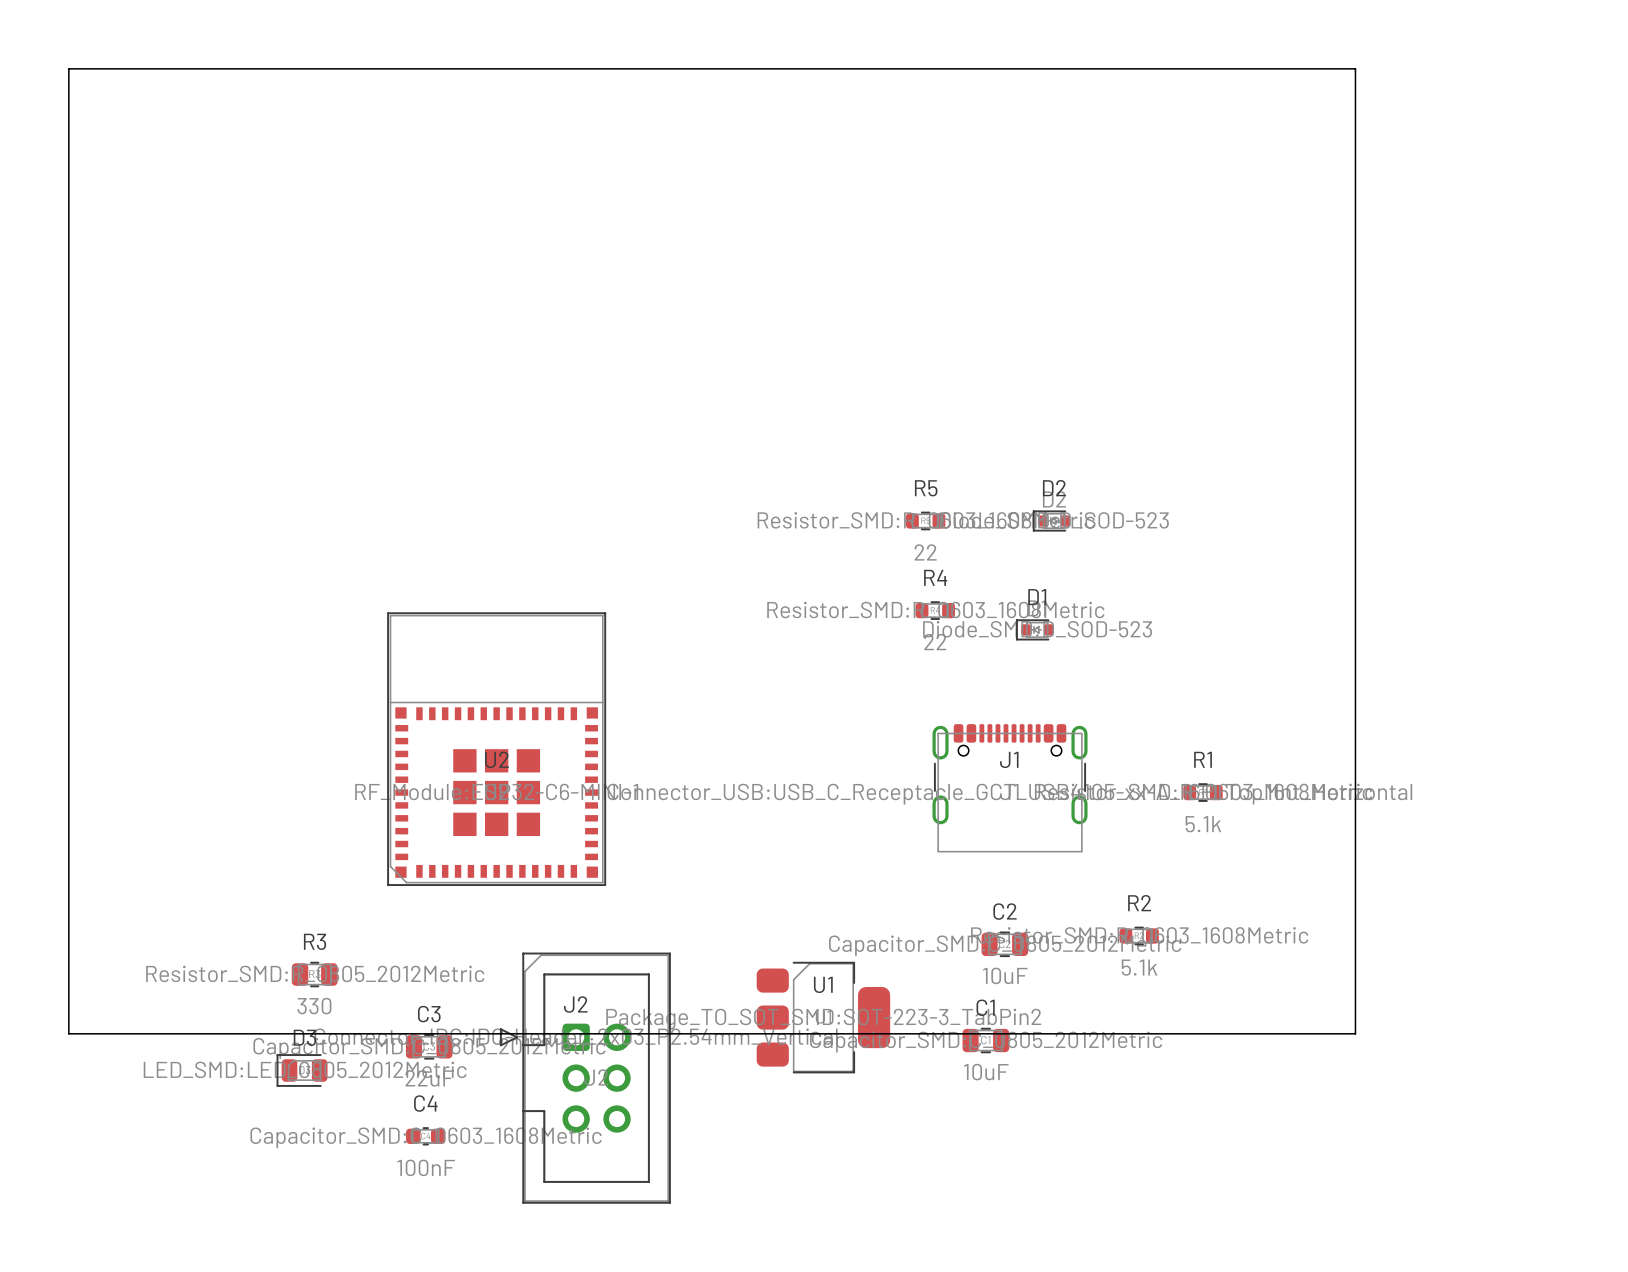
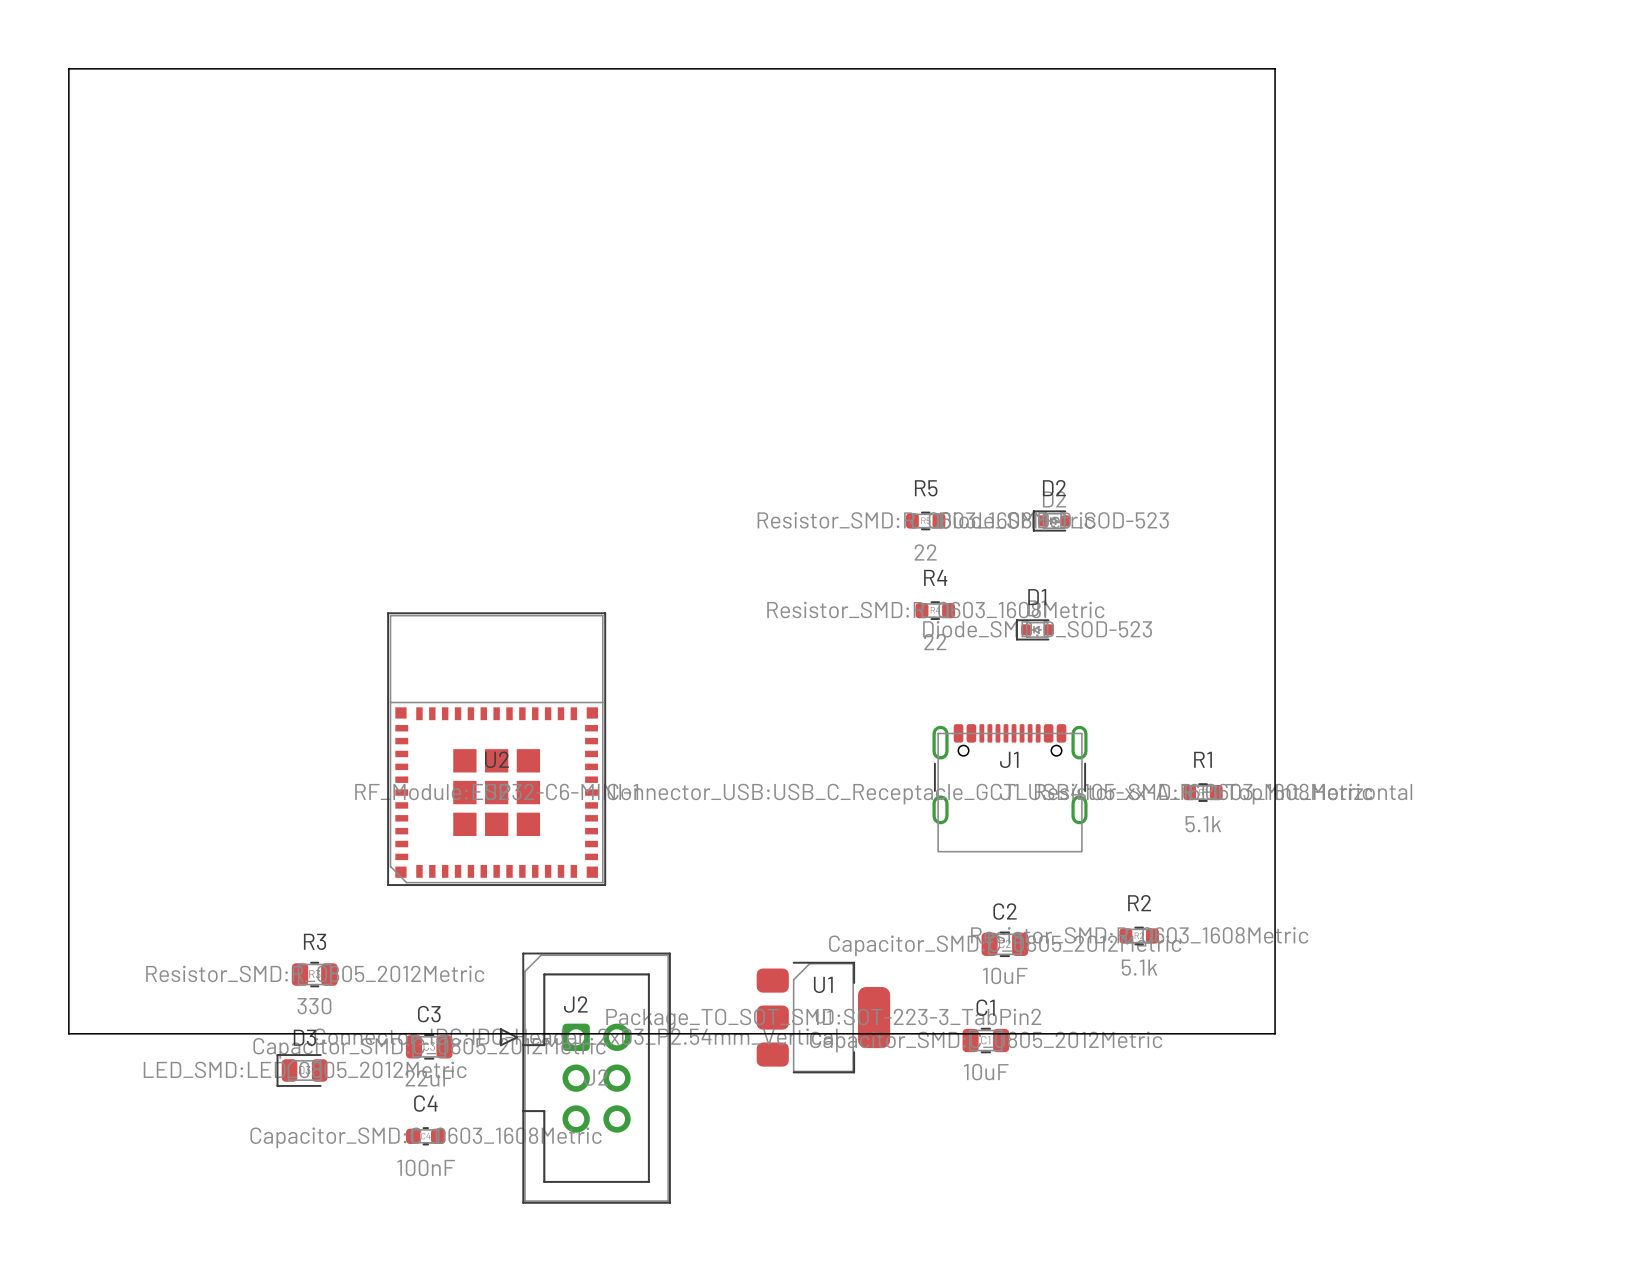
board edge: (1275, 68) (1355, 68) (1355, 1033) (1275, 1033) -> (1275, 68) (1275, 1033)

